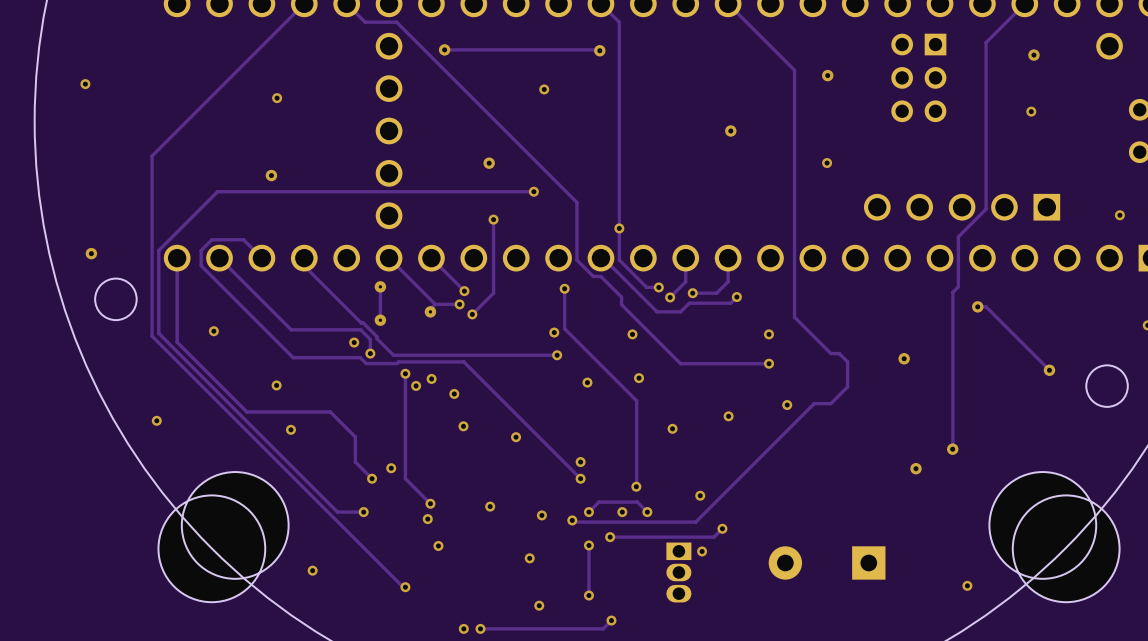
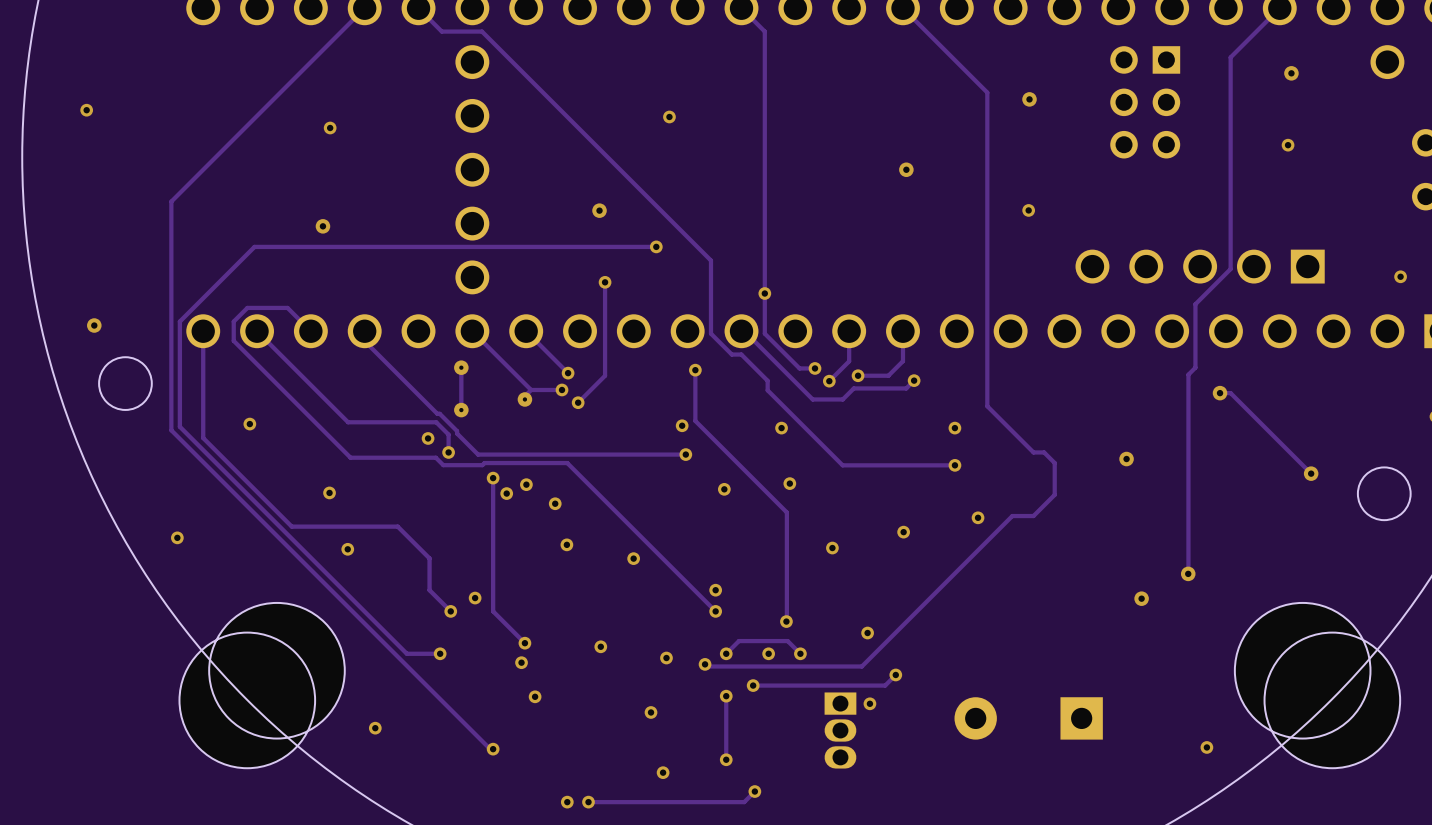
track: (444, 49) (599, 50) -> none
via: (444, 49) -> none
via: (599, 50) -> none

